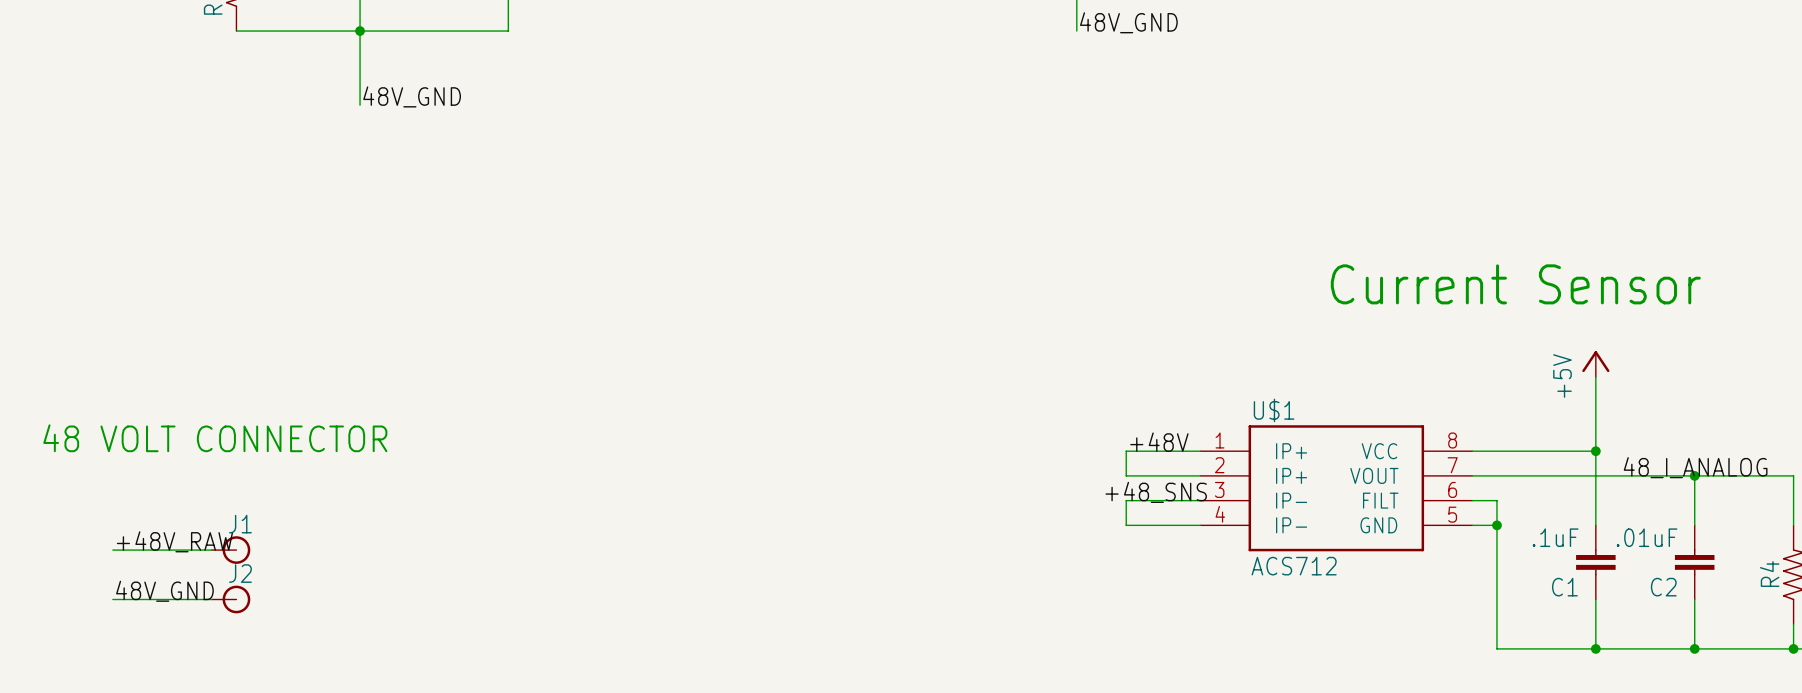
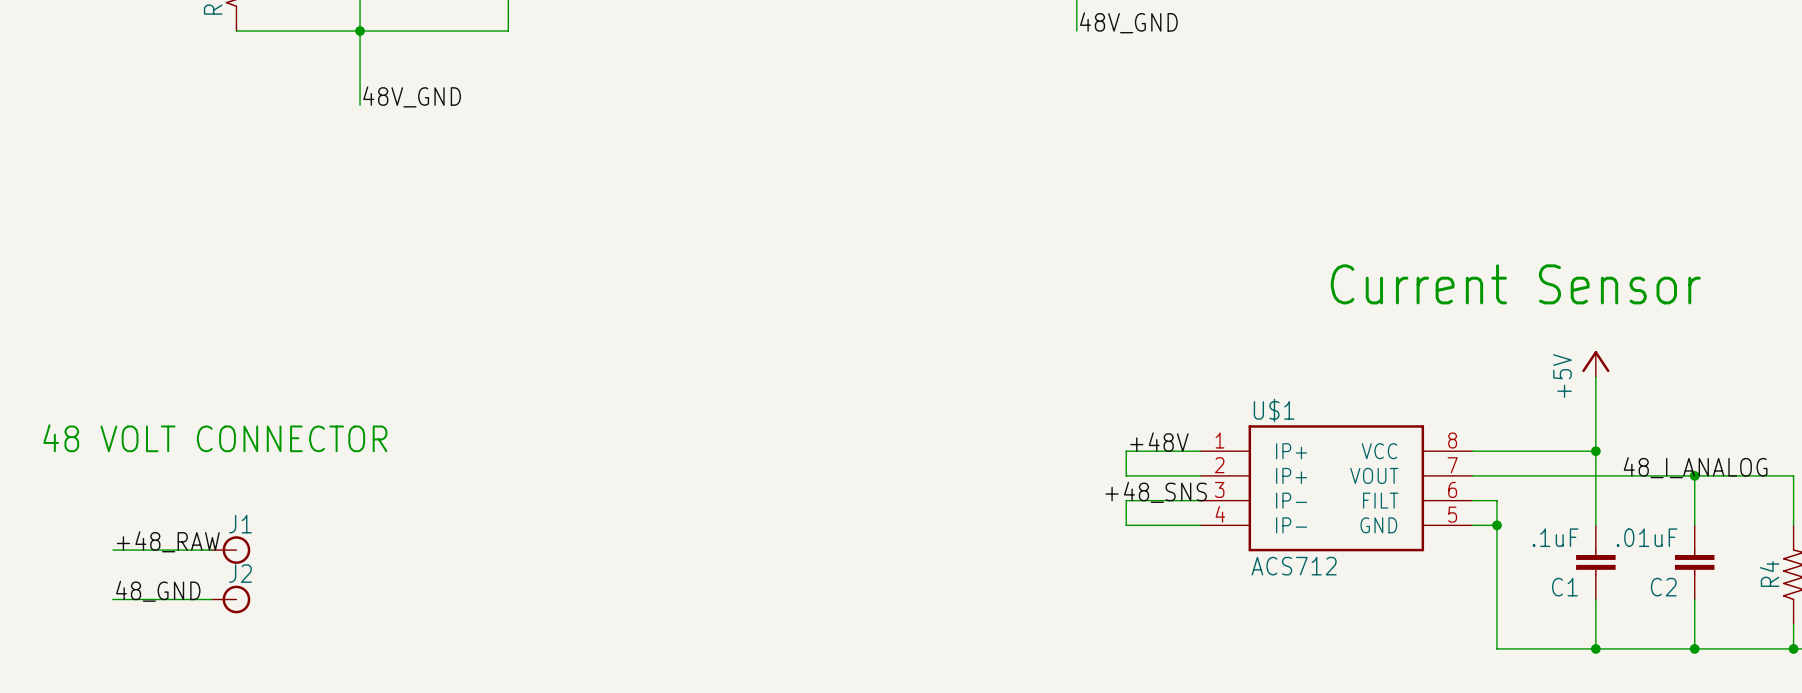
label: +48V_RAW (174, 541) -> +48_RAW (168, 541)
label: 48V_GND (164, 591) -> 48_GND (158, 591)

